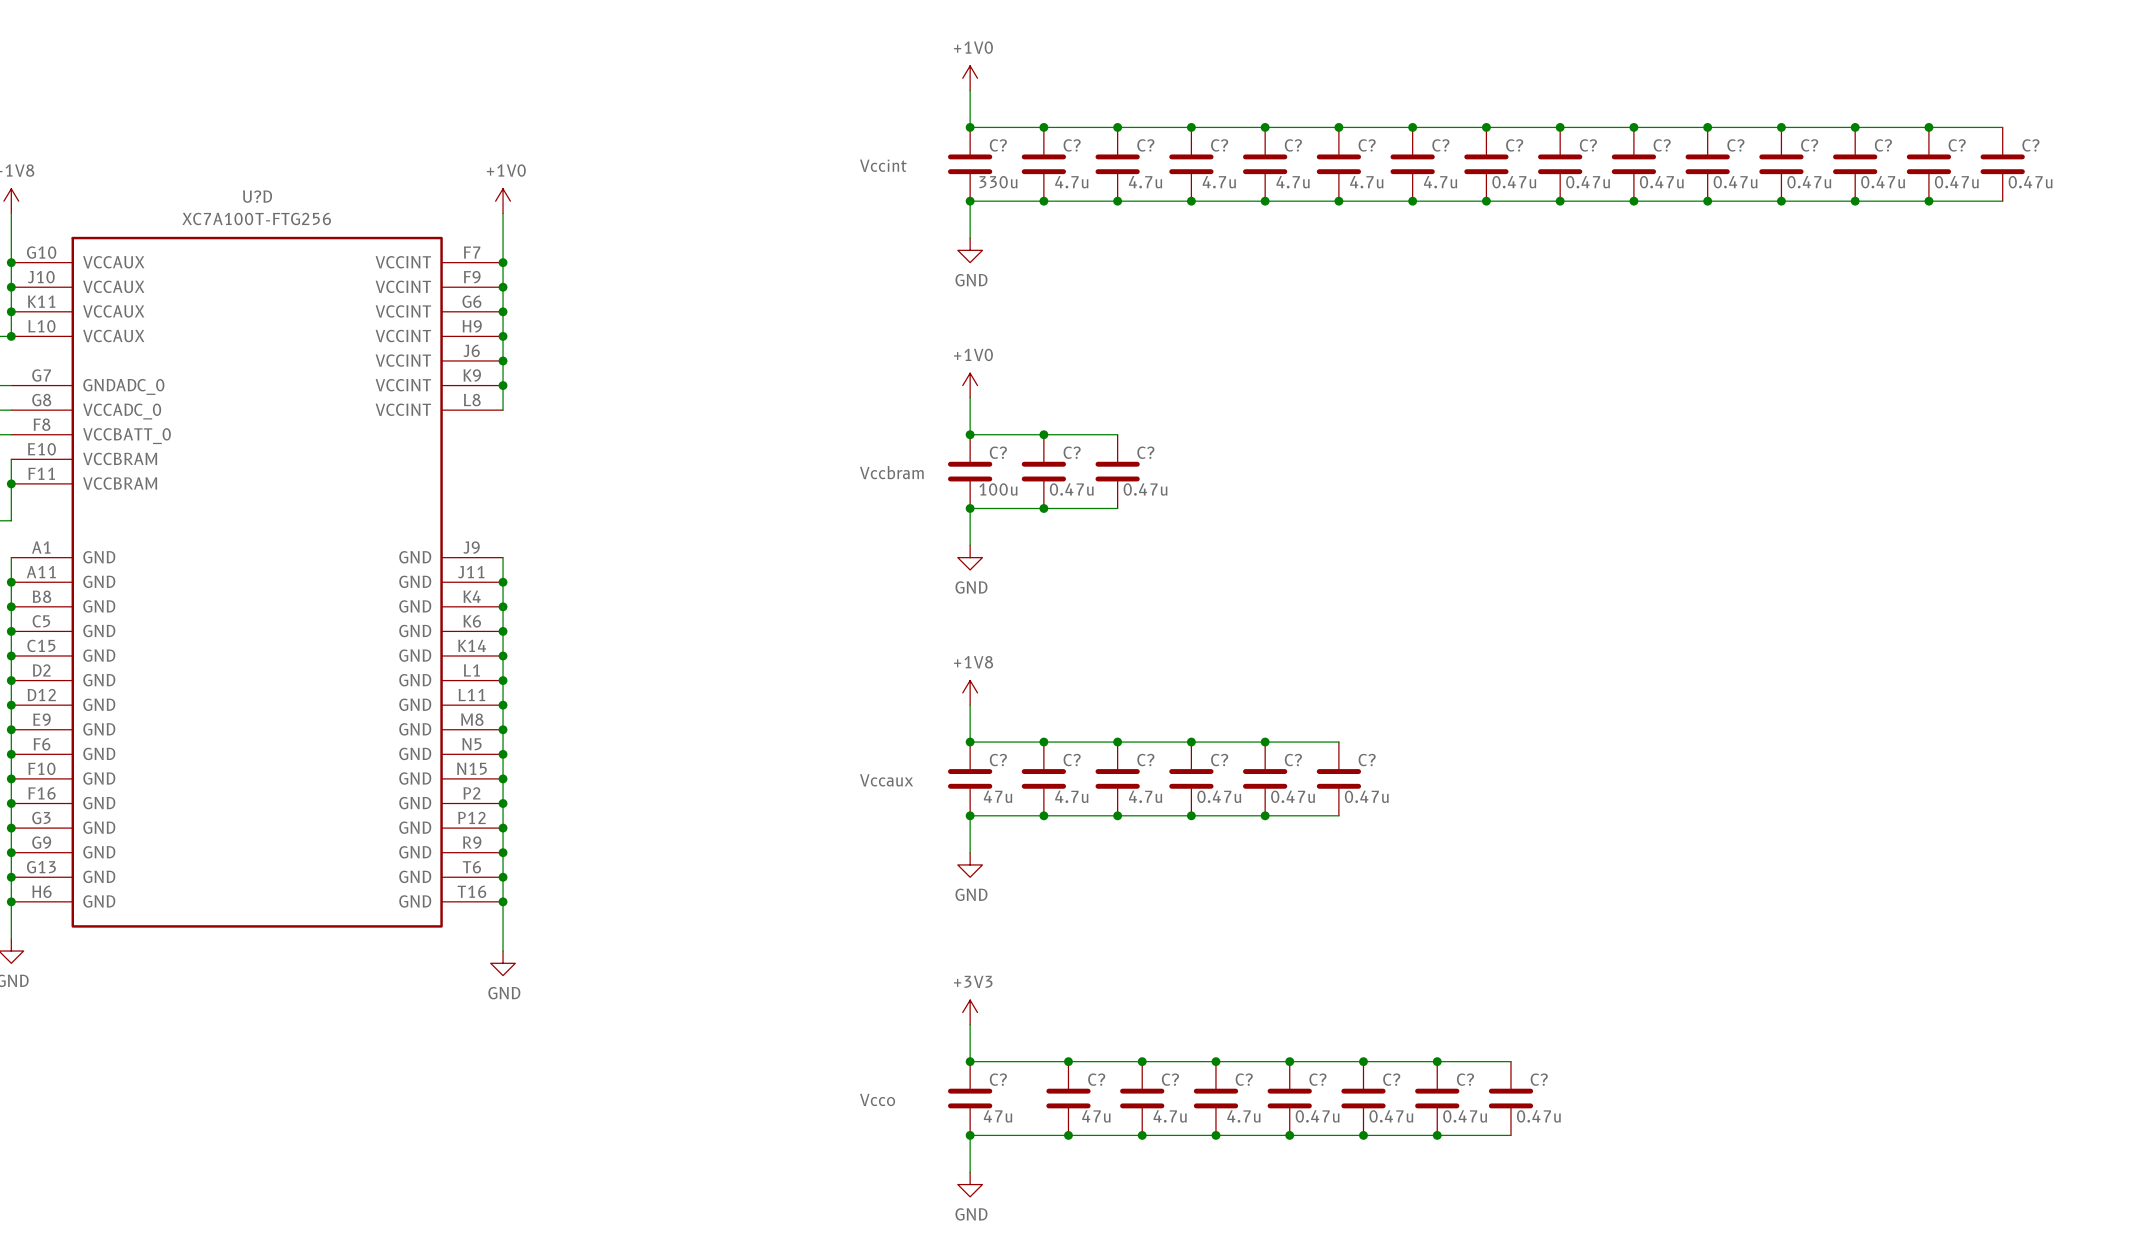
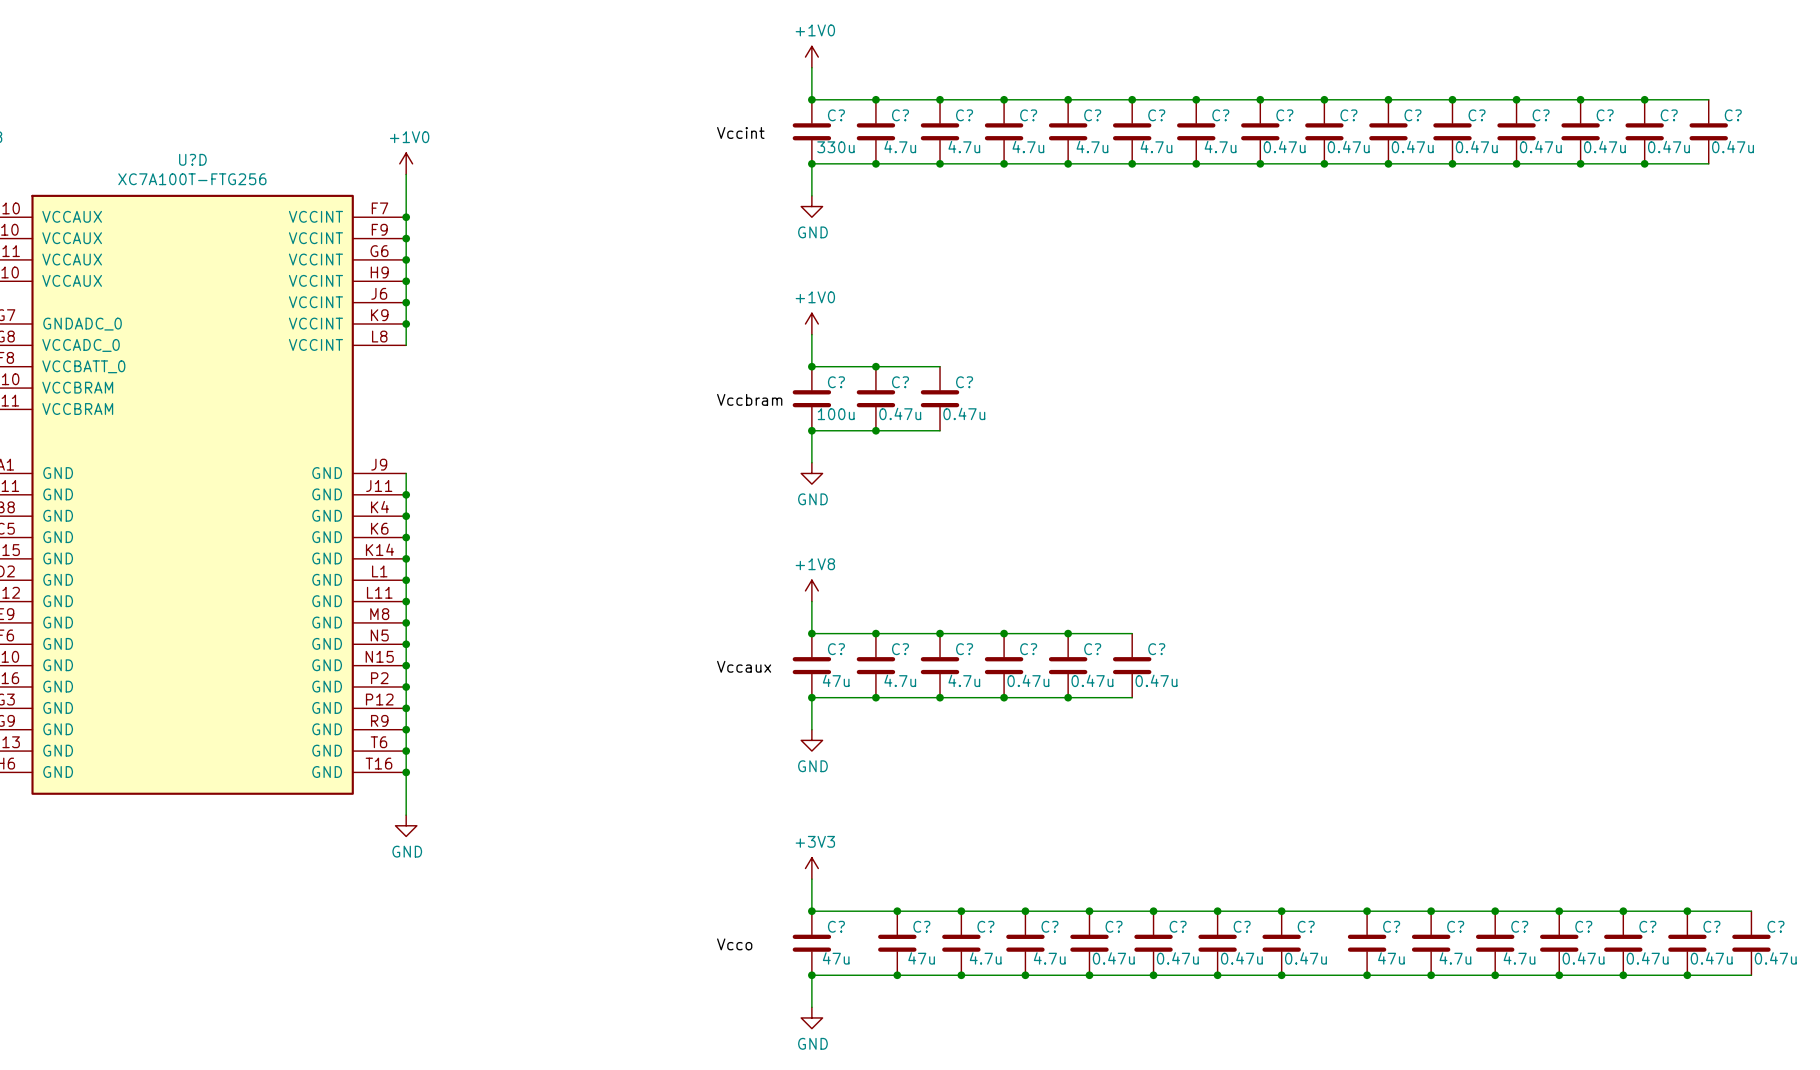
wire: none -> (1281, 911) (1751, 911)
junction: none -> (1281, 911)
junction: none -> (1367, 911)
junction: none -> (1431, 911)
junction: none -> (1495, 911)
junction: none -> (1559, 911)
junction: none -> (1623, 911)
junction: none -> (1687, 911)
C?: none -> 47u (1367, 943)
C?: none -> 4.7u (1431, 943)
C?: none -> 4.7u (1495, 943)
C?: none -> 0.47u (1559, 943)
C?: none -> 0.47u (1623, 943)
C?: none -> 0.47u (1687, 943)
C?: none -> 0.47u (1751, 943)
wire: none -> (1281, 975) (1751, 975)
junction: none -> (1281, 975)
junction: none -> (1367, 975)
junction: none -> (1431, 975)
junction: none -> (1495, 975)
junction: none -> (1559, 975)
junction: none -> (1623, 975)
junction: none -> (1687, 975)

